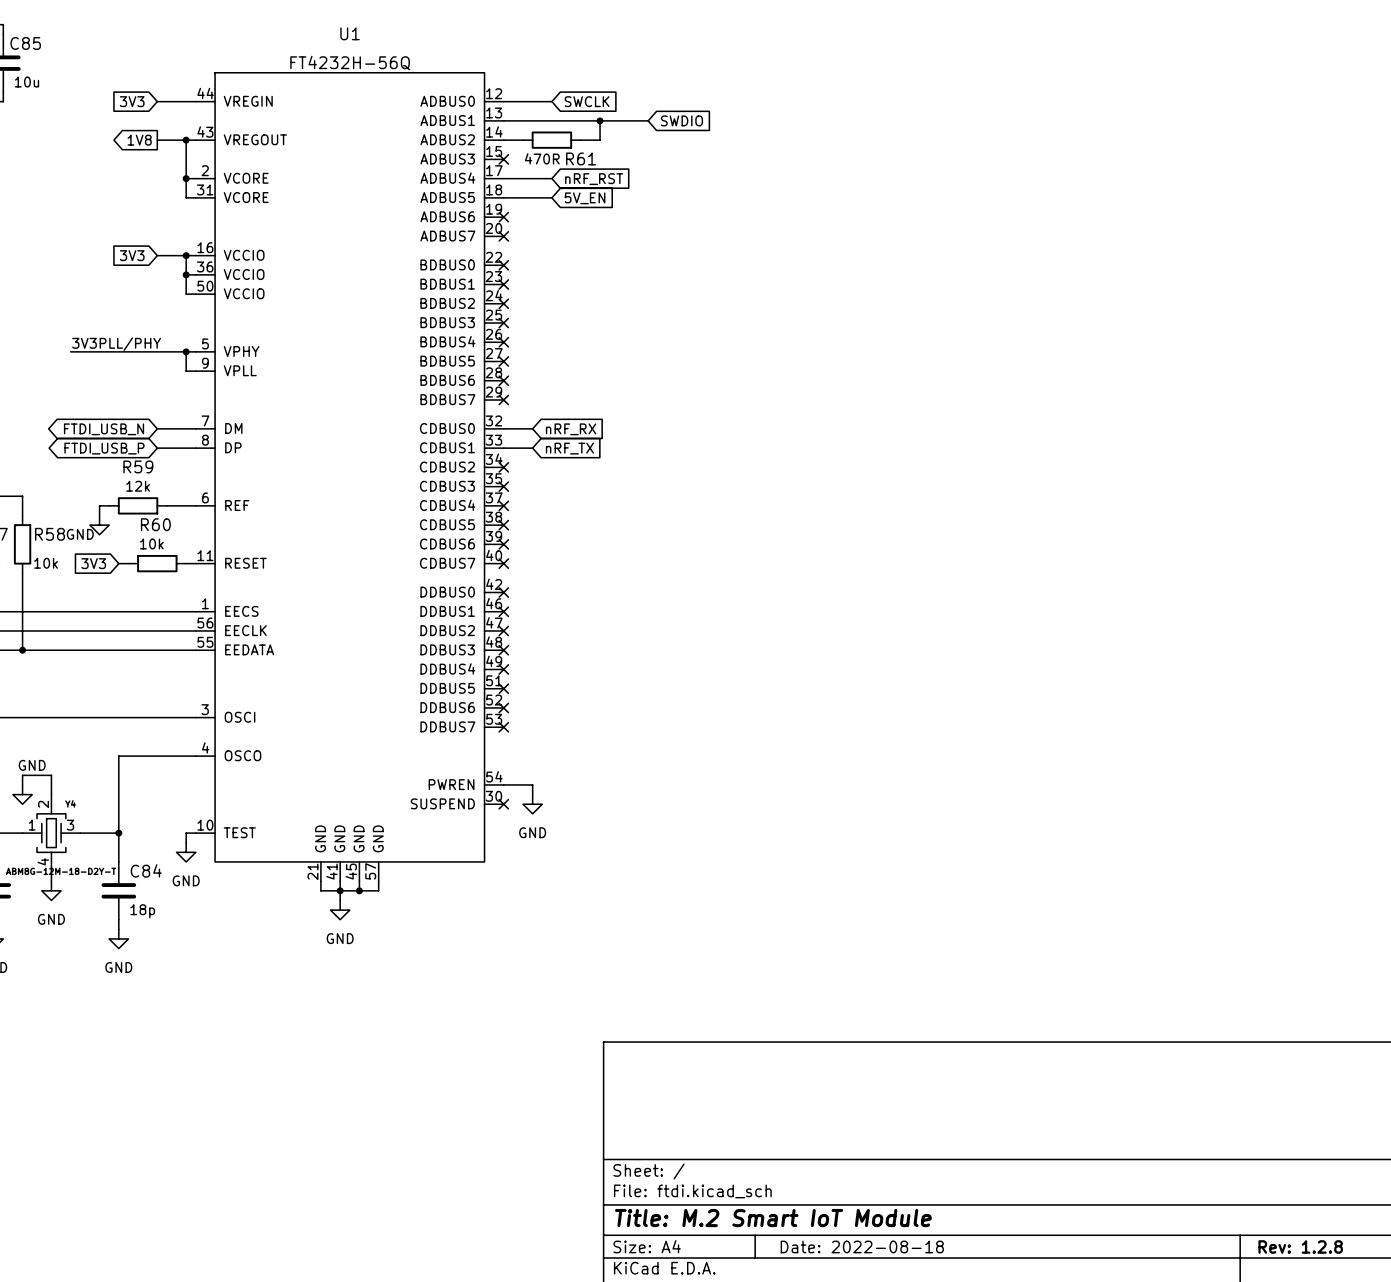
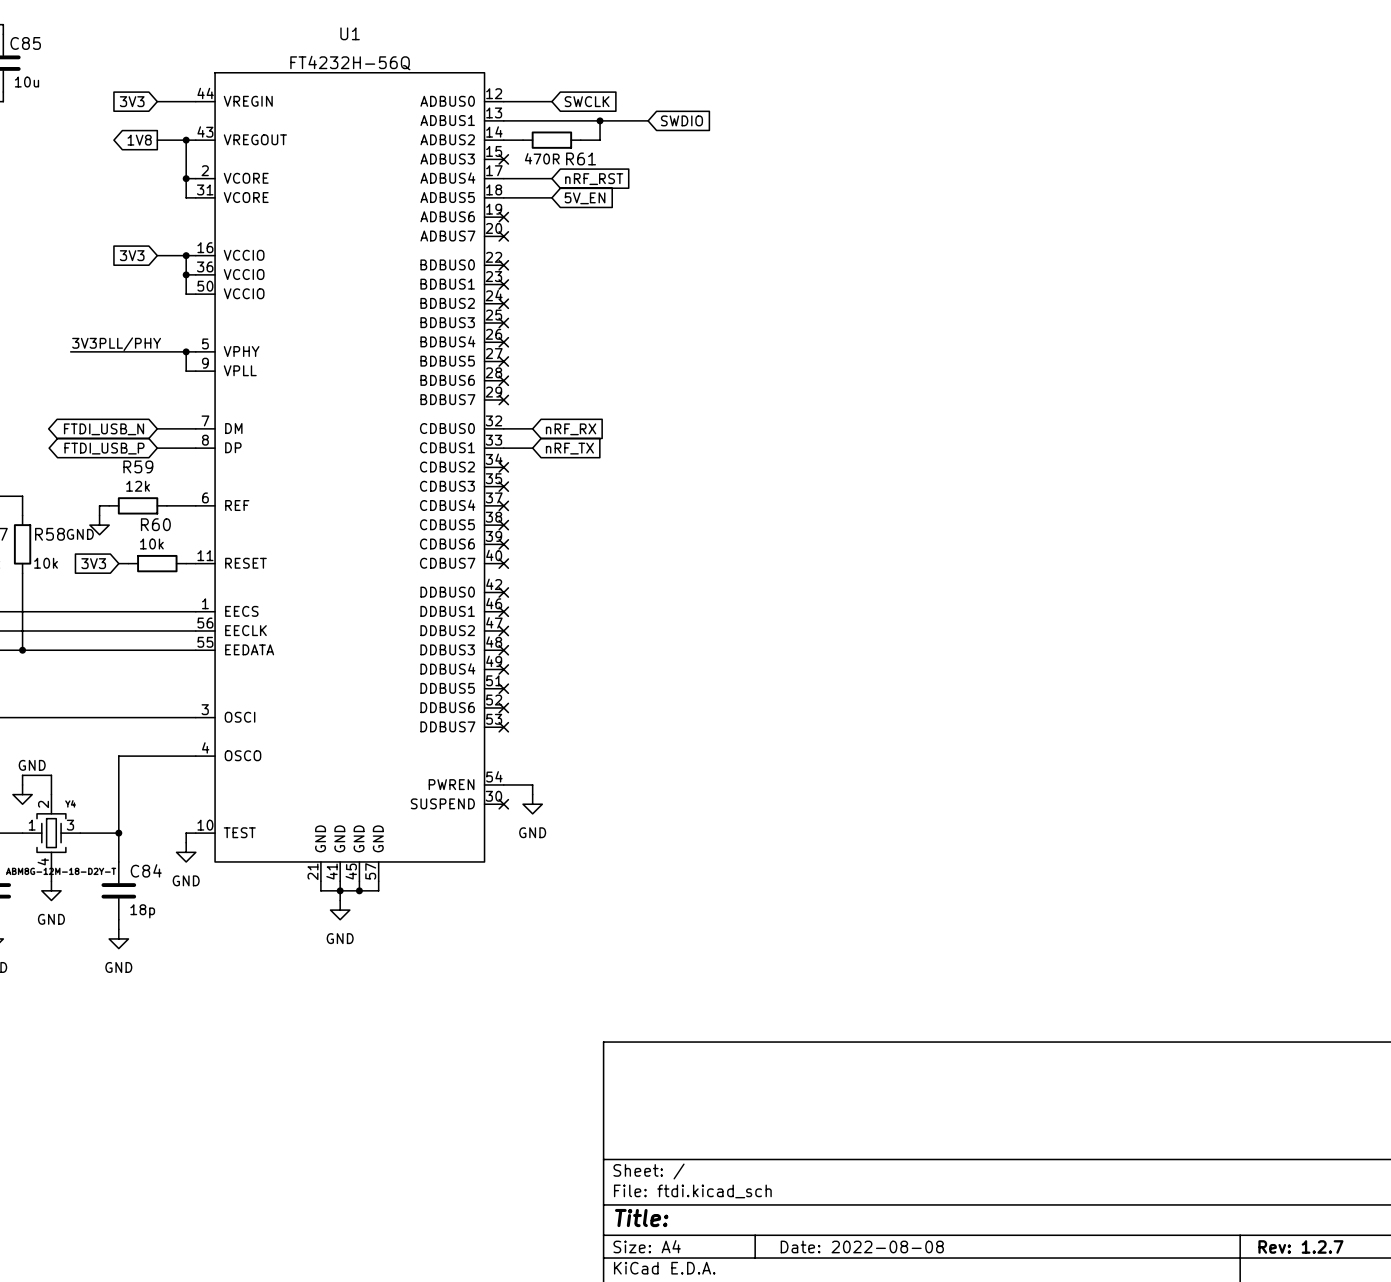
title block: Title: M.2 Smart IoT Module (773, 1218) -> Title: (641, 1218)
title block: Date: 2022-08-18 (862, 1246) -> Date: 2022-08-08 (862, 1246)
title block: Rev: 1.2.8 (1300, 1246) -> Rev: 1.2.7 (1300, 1246)

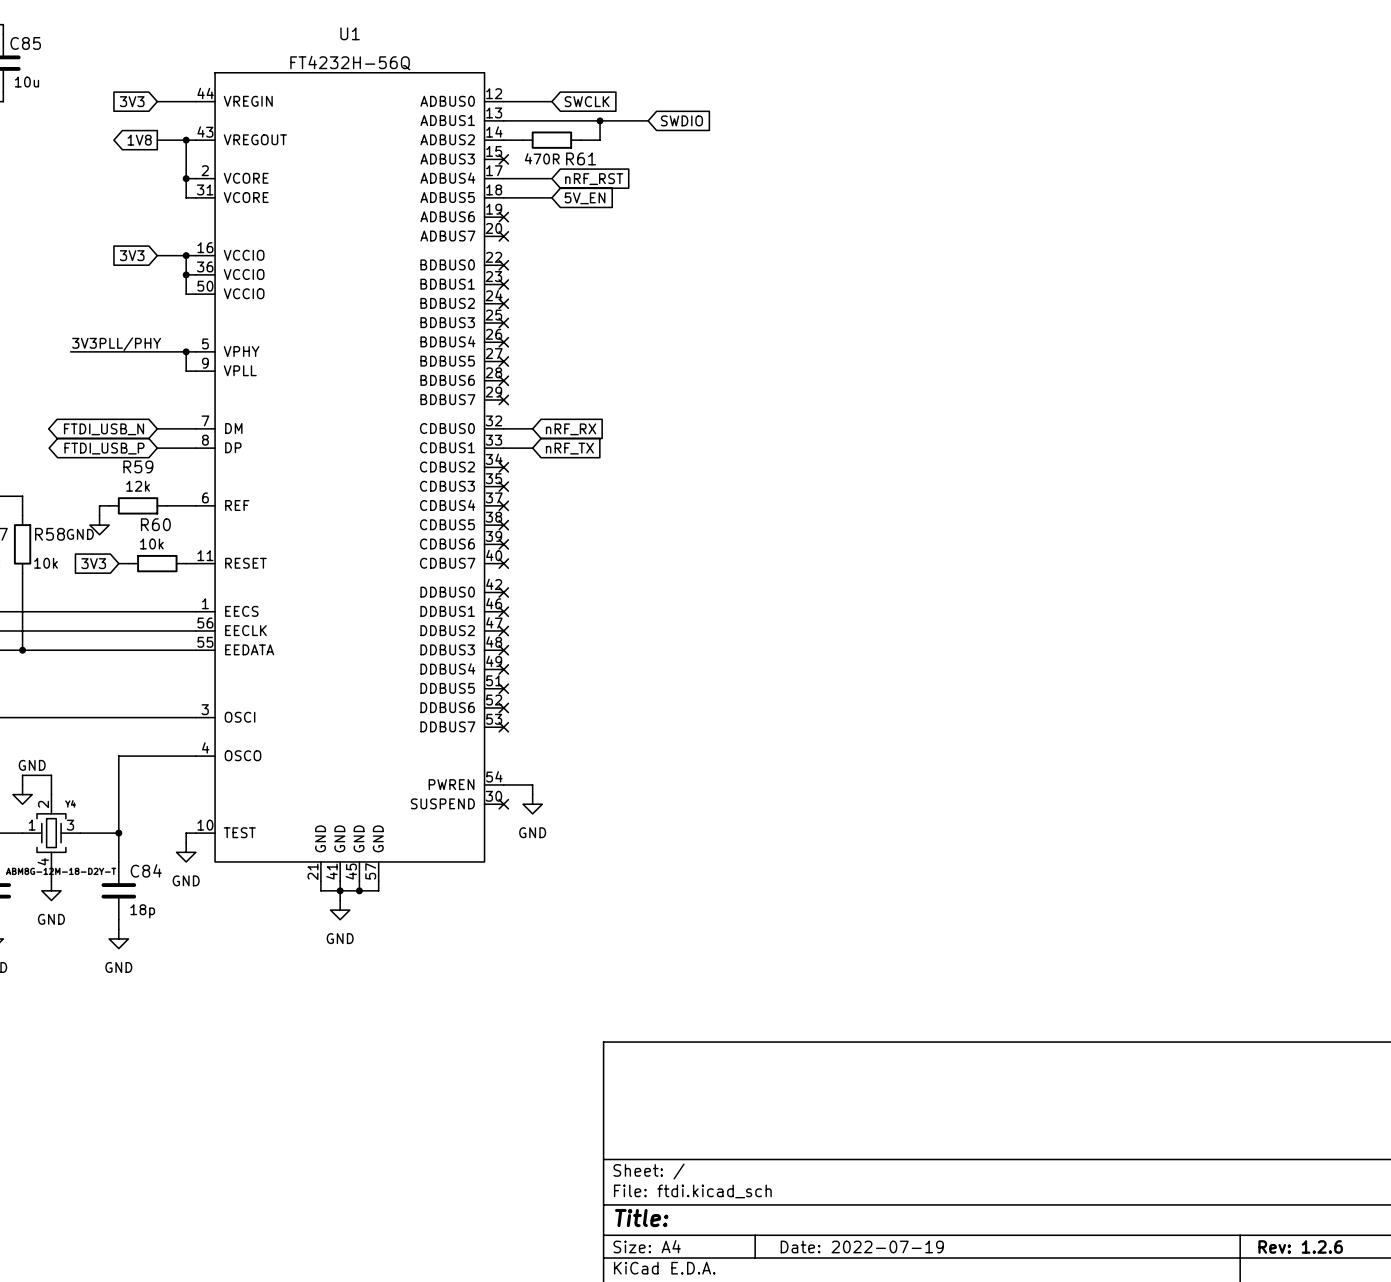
title block: Date: 2022-08-08 (862, 1246) -> Date: 2022-07-19 (862, 1246)
title block: Rev: 1.2.7 (1300, 1246) -> Rev: 1.2.6 (1300, 1246)

